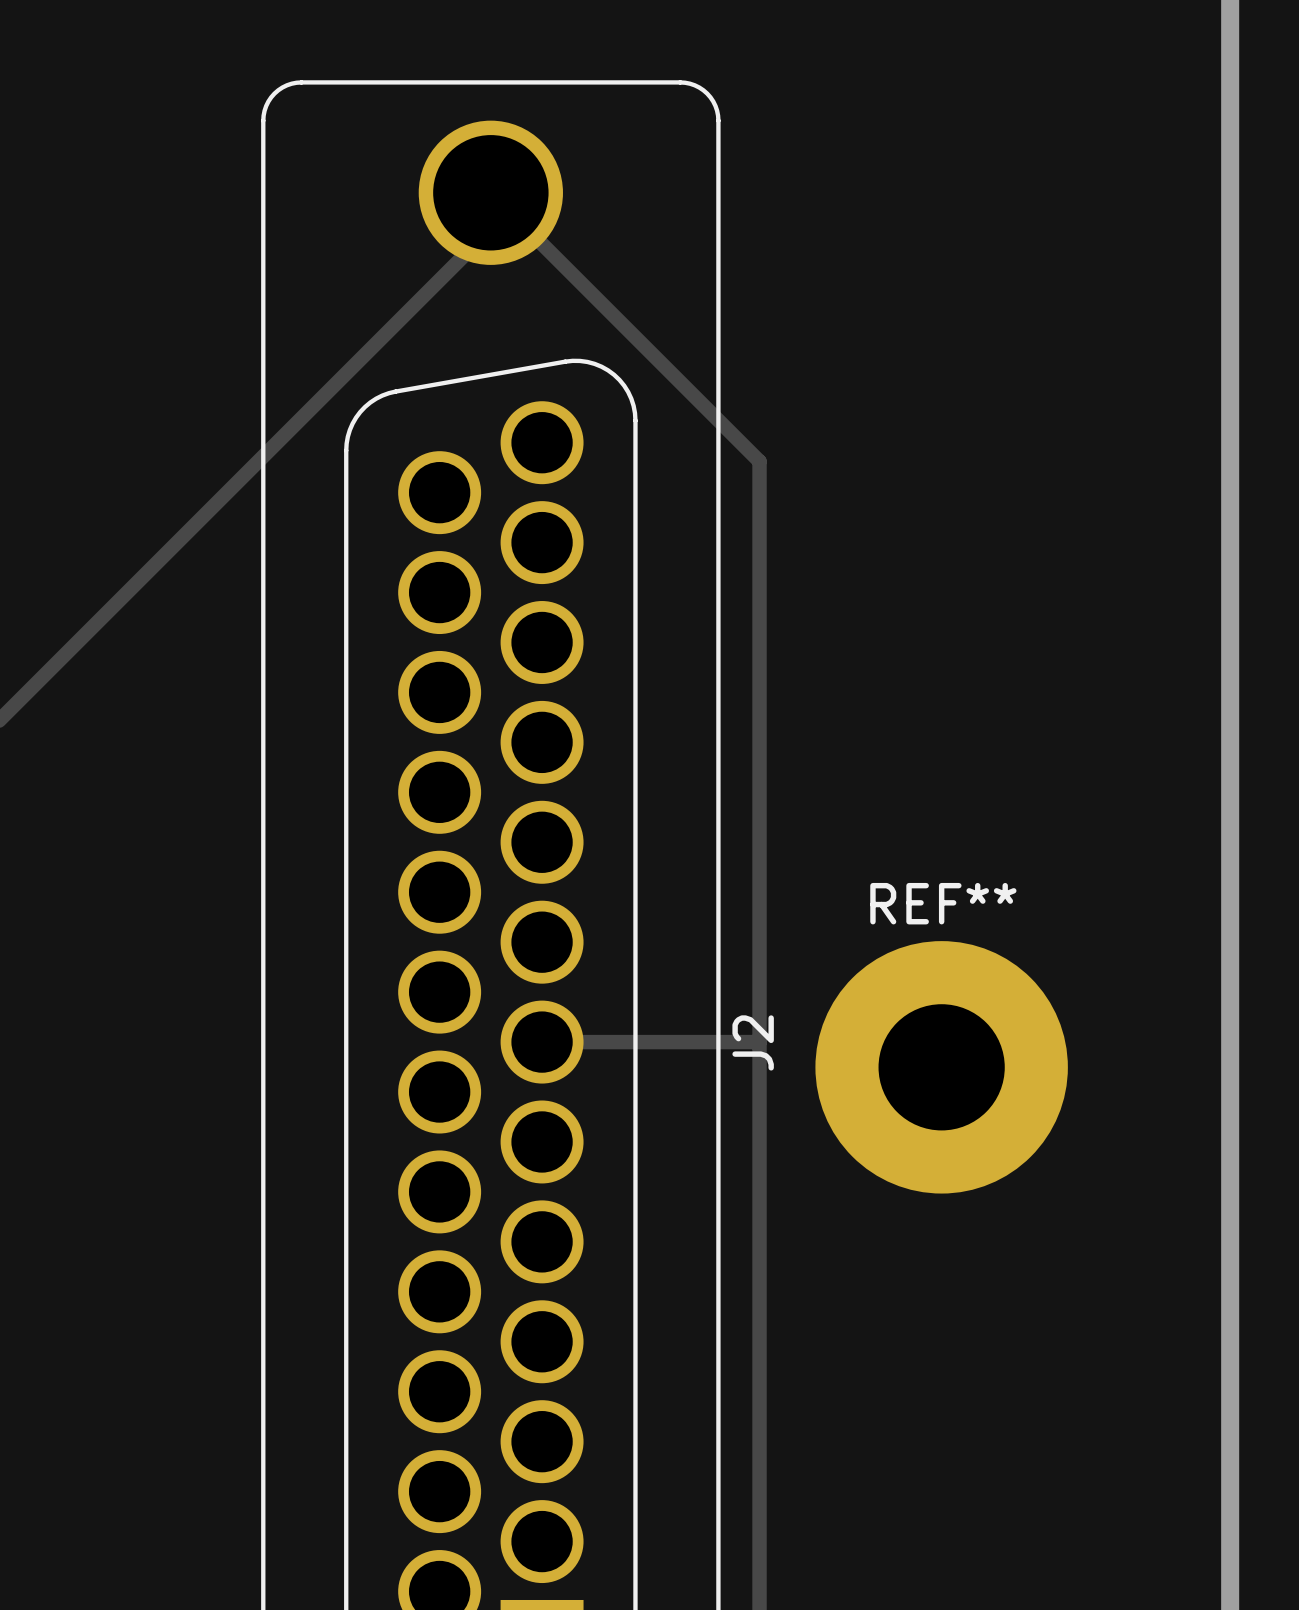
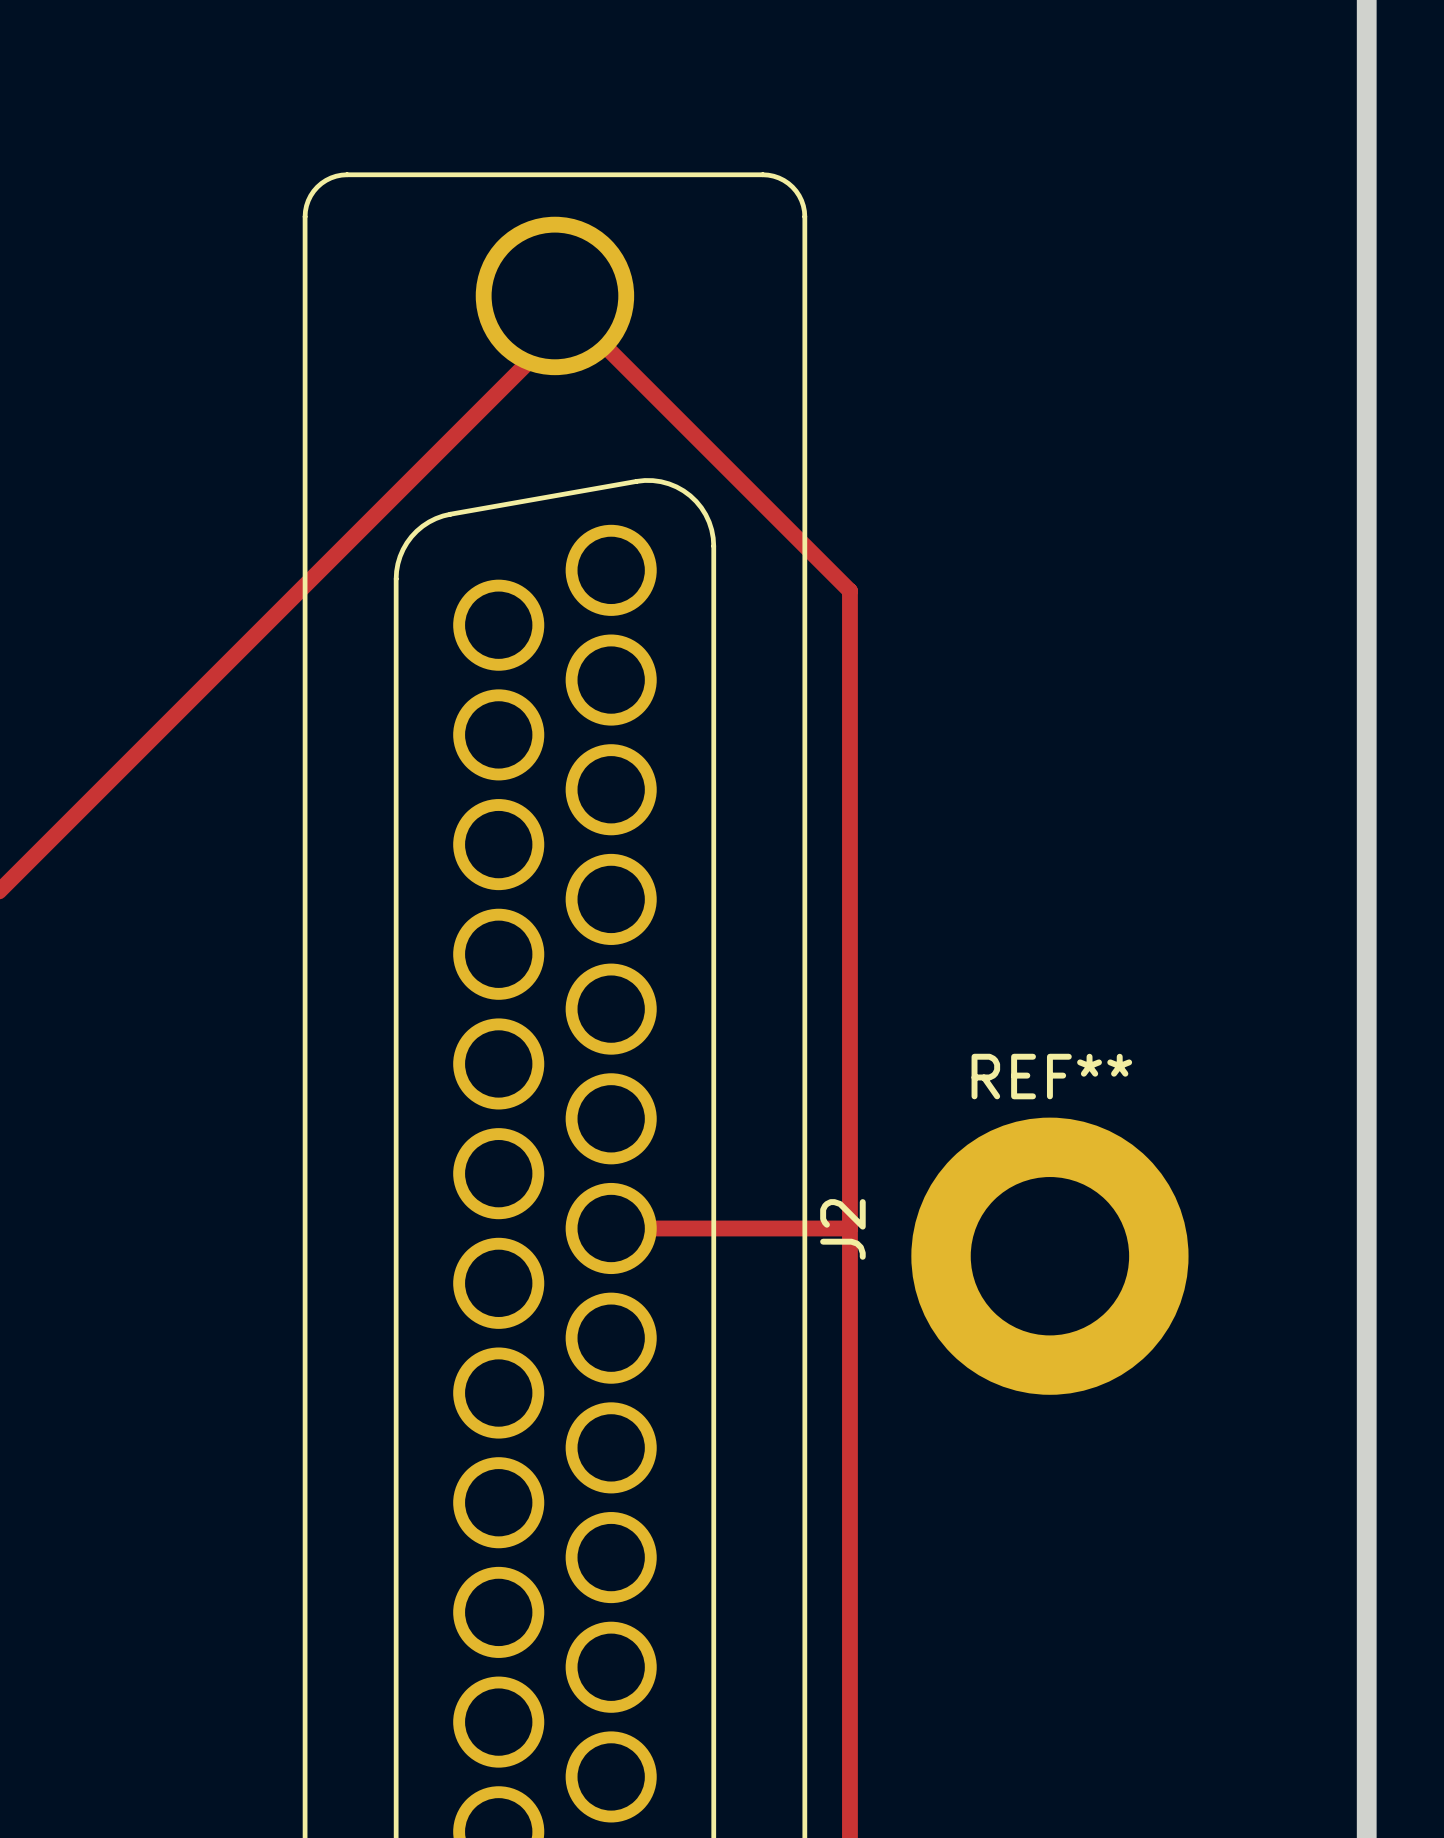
REF** footprint: [815, 941, 1068, 1194] -> [911, 1117, 1189, 1395]

